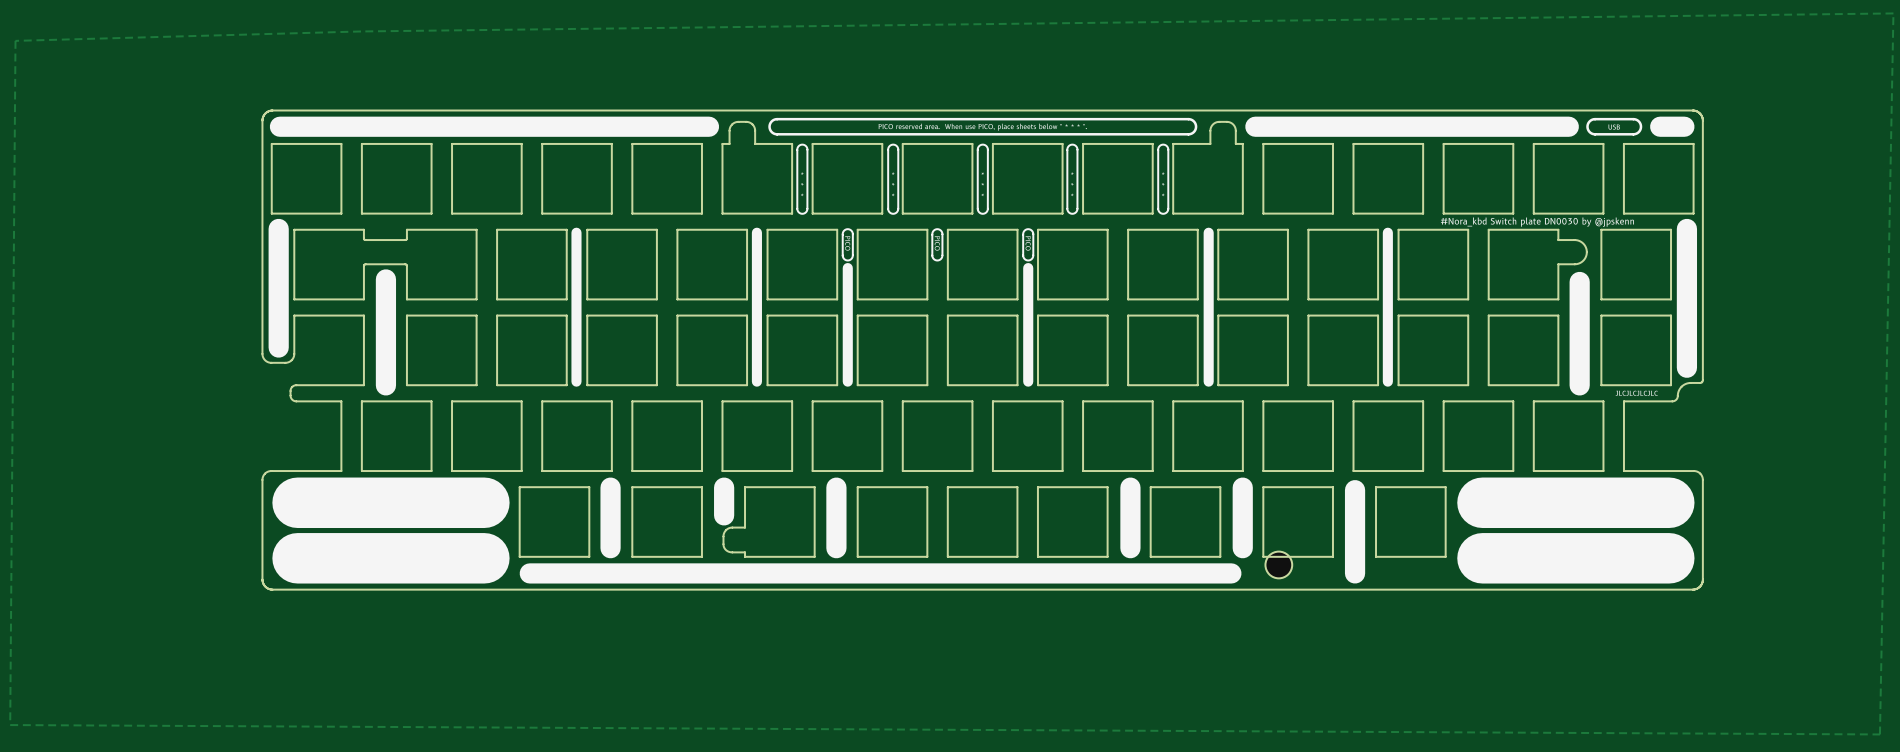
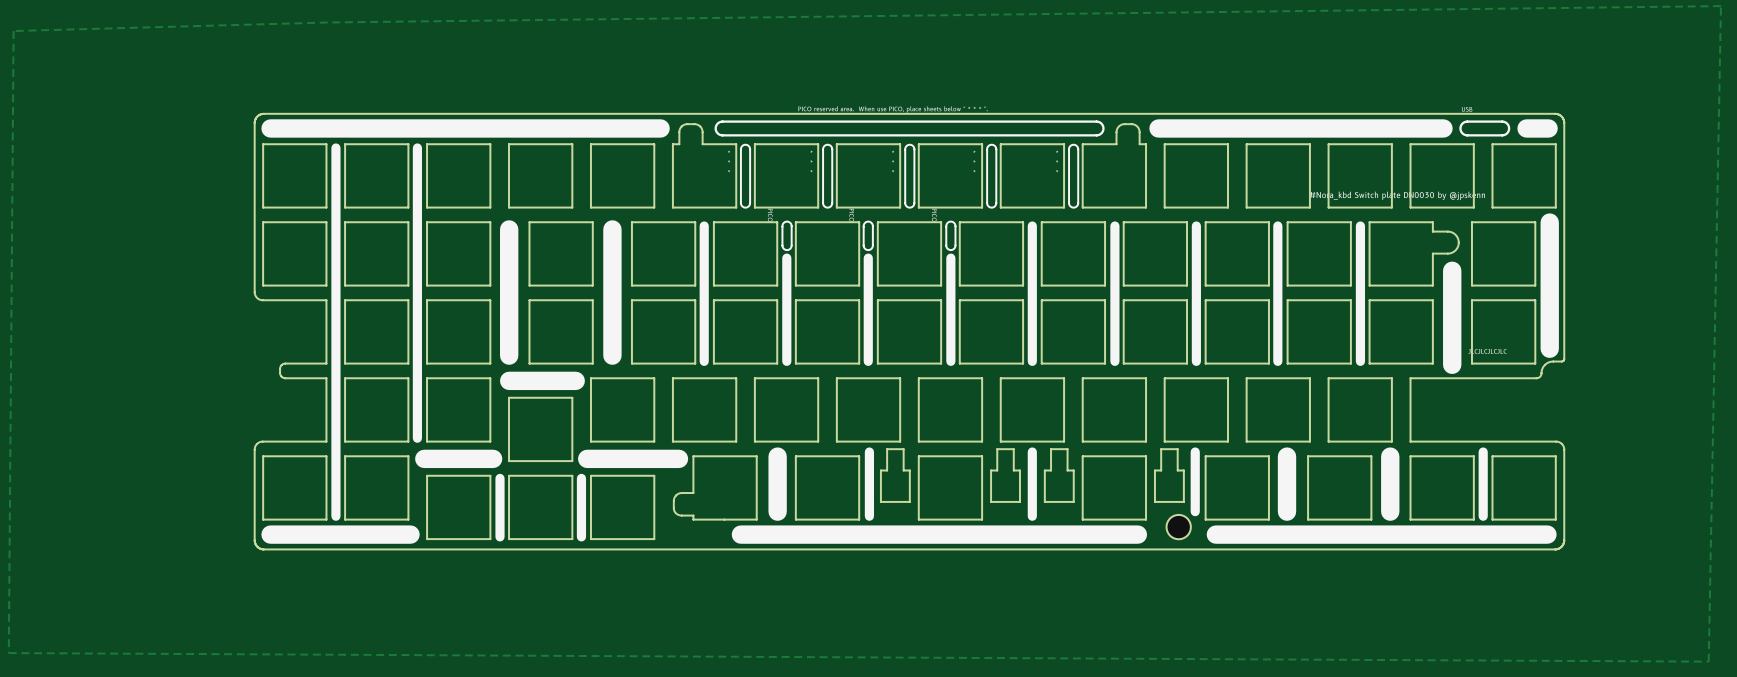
drawing: [261, 109, 1704, 591] -> none
line: (1188, 119) (777, 119) (771, 121) (769, 126) (771, 132) (777, 134) (1188, 134) (1193, 132) (1196, 126) (1193, 121) (1188, 119) -> (1096, 121) (722, 121) (717, 123) (715, 128) (717, 133) (722, 135) (1096, 135) (1101, 133) (1103, 128) (1101, 123) (1096, 121)
line: (1633, 119) (1594, 119) (1589, 122) (1587, 127) (1589, 132) (1594, 134) (1634, 134) (1638, 132) (1640, 126) (1638, 121) (1633, 119) -> (1502, 121) (1466, 121) (1461, 124) (1460, 129) (1466, 135) (1503, 135) (1507, 133) (1509, 128) (1507, 123) (1502, 121)
line: (708, 126) (279, 126) -> (660, 128) (270, 128)
line: (1568, 126) (1255, 126) -> (1443, 128) (1158, 128)
line: (1684, 126) (1660, 126) -> (1548, 128) (1526, 128)
board edge: none -> (694, 124) (682, 126) (679, 131) (679, 144) (672, 144) (672, 207) (736, 207) (736, 144) (702, 144) (702, 129) (694, 124)
board edge: none -> (1131, 124) (1122, 124) (1118, 127) (1116, 144) (1082, 144) (1082, 207) (1146, 207) (1146, 144) (1139, 144) (1138, 129) (1131, 124)
line: (807, 149) (807, 209) (801, 213) (797, 209) (797, 148) (802, 144) (807, 149) -> (750, 149) (750, 203) (744, 207) (740, 203) (740, 148) (745, 144) (750, 149)
line: (898, 149) (898, 209) (892, 213) (888, 209) (888, 148) (893, 144) (898, 149) -> (832, 149) (832, 203) (827, 207) (823, 203) (823, 148) (828, 144) (832, 149)
line: (987, 149) (987, 209) (982, 213) (977, 209) (977, 148) (983, 144) (987, 149) -> (914, 149) (914, 203) (909, 207) (905, 203) (905, 148) (910, 144) (914, 149)
line: (1077, 149) (1077, 209) (1071, 213) (1067, 209) (1067, 148) (1072, 144) (1077, 149) -> (996, 149) (996, 203) (991, 207) (987, 203) (987, 148) (992, 144) (996, 149)
line: (1168, 149) (1168, 209) (1162, 213) (1158, 209) (1158, 148) (1163, 144) (1168, 149) -> (1078, 149) (1078, 203) (1073, 207) (1069, 203) (1069, 148) (1073, 144) (1078, 149)
board edge: none -> (326, 144) (326, 207) (263, 207) (263, 144) (326, 144)
board edge: none -> (408, 144) (408, 207) (345, 207) (345, 144) (408, 144)
board edge: none -> (490, 144) (490, 207) (427, 207) (427, 144) (490, 144)
board edge: none -> (572, 144) (572, 207) (509, 207) (509, 144) (572, 144)
board edge: none -> (654, 144) (654, 207) (590, 207) (590, 144) (654, 144)
board edge: none -> (818, 144) (818, 207) (754, 207) (754, 144) (818, 144)
board edge: none -> (900, 144) (900, 207) (836, 207) (836, 144) (900, 144)
board edge: none -> (982, 144) (982, 207) (918, 207) (918, 144) (982, 144)
board edge: none -> (1064, 144) (1064, 207) (1000, 207) (1000, 144) (1064, 144)
board edge: none -> (1227, 144) (1227, 207) (1164, 207) (1164, 144) (1227, 144)
board edge: none -> (1309, 144) (1309, 207) (1246, 207) (1246, 144) (1309, 144)
board edge: none -> (1391, 144) (1391, 207) (1328, 207) (1328, 144) (1391, 144)
board edge: none -> (1473, 144) (1473, 207) (1410, 207) (1410, 144) (1473, 144)
board edge: none -> (1555, 144) (1555, 207) (1492, 207) (1492, 144) (1555, 144)
line: none -> (335, 147) (335, 516)
line: none -> (417, 147) (417, 438)
line: (278, 228) (278, 347) -> none
line: (1686, 228) (1686, 367) -> (1549, 222) (1549, 348)
line: (576, 232) (576, 381) -> none
line: (756, 232) (756, 381) -> (704, 225) (704, 361)
line: (1208, 232) (1208, 381) -> (1114, 225) (1114, 361)
line: (1387, 232) (1387, 381) -> (1277, 225) (1277, 361)
board edge: none -> (326, 222) (263, 222) (263, 285) (326, 285) (326, 222)
board edge: none -> (408, 222) (345, 222) (345, 285) (408, 285) (408, 222)
board edge: none -> (490, 222) (427, 222) (427, 285) (490, 285) (490, 222)
board edge: none -> (592, 222) (529, 222) (529, 285) (592, 285) (592, 222)
board edge: none -> (695, 222) (631, 222) (631, 285) (695, 285) (695, 222)
board edge: none -> (777, 222) (713, 222) (713, 285) (777, 285) (777, 222)
board edge: none -> (859, 222) (859, 285) (795, 285) (795, 222) (859, 222)
board edge: none -> (941, 222) (877, 222) (877, 285) (941, 285) (941, 222)
board edge: none -> (1023, 222) (959, 222) (959, 285) (1023, 285) (1023, 222)
board edge: none -> (1105, 222) (1041, 222) (1041, 285) (1105, 285) (1105, 222)
board edge: none -> (1187, 222) (1123, 222) (1123, 285) (1187, 285) (1187, 222)
board edge: none -> (1268, 222) (1205, 222) (1205, 285) (1268, 285) (1268, 222)
board edge: none -> (1350, 222) (1350, 285) (1287, 285) (1287, 222) (1350, 222)
board edge: none -> (1432, 222) (1369, 222) (1369, 285) (1432, 285) (1432, 253) (1452, 252) (1456, 248) (1458, 242) (1456, 236) (1452, 232) (1432, 231) (1432, 222)
board edge: none -> (1535, 222) (1471, 222) (1471, 285) (1535, 285) (1535, 222)
line: (852, 255) (847, 260) (842, 255) -> (791, 245) (787, 250) (782, 245)
line: (852, 255) (852, 232) (847, 229) (842, 233) (842, 255) -> (791, 245) (791, 225) (786, 221) (782, 225) (782, 245)
line: (942, 255) (937, 260) (932, 255) -> (872, 245) (868, 250) (863, 245)
line: (942, 255) (942, 232) (937, 229) (932, 233) (932, 255) -> (872, 245) (872, 225) (868, 221) (863, 225) (863, 245)
line: (1033, 255) (1028, 260) (1023, 255) -> (955, 245) (950, 250) (946, 245)
line: (1033, 255) (1033, 232) (1027, 229) (1023, 233) (1023, 255) -> (955, 245) (955, 225) (950, 221) (946, 225) (946, 245)
line: none -> (1032, 225) (1032, 361)
line: none -> (1196, 225) (1196, 361)
line: none -> (1360, 225) (1360, 361)
line: none -> (509, 229) (509, 355)
line: none -> (612, 229) (612, 355)
line: (847, 268) (847, 381) -> (786, 258) (786, 361)
line: (1028, 268) (1028, 381) -> (950, 258) (950, 361)
line: (385, 279) (385, 385) -> none
line: (1579, 281) (1579, 385) -> (1452, 270) (1452, 364)
line: none -> (868, 258) (868, 361)
board edge: none -> (408, 300) (345, 300) (345, 363) (408, 363) (408, 300)
board edge: none -> (490, 300) (427, 300) (427, 363) (490, 363) (490, 300)
board edge: none -> (592, 300) (529, 300) (529, 363) (592, 363) (592, 300)
board edge: none -> (695, 300) (631, 300) (631, 363) (695, 363) (695, 300)
board edge: none -> (777, 300) (713, 300) (713, 363) (777, 363) (777, 300)
board edge: none -> (859, 300) (795, 300) (795, 363) (859, 363) (859, 300)
board edge: none -> (941, 300) (877, 300) (877, 363) (941, 363) (941, 300)
board edge: none -> (1023, 300) (959, 300) (959, 363) (1023, 363) (1023, 300)
board edge: none -> (1105, 300) (1041, 300) (1041, 363) (1105, 363) (1105, 300)
board edge: none -> (1187, 300) (1123, 300) (1123, 363) (1187, 363) (1187, 300)
board edge: none -> (1268, 300) (1205, 300) (1205, 363) (1268, 363) (1268, 300)
board edge: none -> (1350, 300) (1287, 300) (1287, 363) (1350, 363) (1350, 300)
board edge: none -> (1432, 300) (1369, 300) (1369, 363) (1432, 363) (1432, 300)
board edge: none -> (1535, 300) (1471, 300) (1471, 363) (1535, 363) (1535, 300)
board edge: none -> (1541, 373) (1536, 378) (1410, 378) (1410, 441) (1556, 441) (1560, 443) (1564, 449) (1564, 540) (1562, 546) (1556, 549) (261, 549) (256, 546) (254, 540) (255, 445) (262, 441) (326, 441) (326, 378) (284, 378) (280, 372) (280, 366) (284, 363) (326, 363) (326, 300) (261, 300) (255, 295) (254, 121) (257, 116) (263, 113) (1556, 113) (1562, 117) (1564, 123) (1564, 359) (1561, 361) (1547, 363) (1543, 367) (1541, 373)
board edge: none -> (408, 378) (345, 378) (345, 441) (408, 441) (408, 378)
board edge: none -> (490, 378) (427, 378) (427, 441) (490, 441) (490, 378)
board edge: none -> (654, 378) (590, 378) (590, 441) (654, 441) (654, 378)
board edge: none -> (736, 378) (672, 378) (672, 441) (736, 441) (736, 378)
board edge: none -> (818, 378) (754, 378) (754, 441) (818, 441) (818, 378)
board edge: none -> (900, 378) (836, 378) (836, 441) (900, 441) (900, 378)
board edge: none -> (982, 378) (918, 378) (918, 441) (982, 441) (982, 378)
board edge: none -> (1064, 378) (1000, 378) (1000, 441) (1064, 441) (1064, 378)
board edge: none -> (1146, 378) (1082, 378) (1082, 441) (1146, 441) (1146, 378)
board edge: none -> (1228, 378) (1164, 378) (1164, 441) (1228, 441) (1228, 378)
board edge: none -> (1309, 378) (1246, 378) (1246, 441) (1309, 441) (1309, 378)
board edge: none -> (1391, 378) (1328, 378) (1328, 441) (1391, 441) (1391, 378)
line: none -> (575, 380) (509, 380)
board edge: none -> (572, 397) (509, 397) (509, 461) (572, 461) (572, 397)
line: (610, 487) (610, 548) -> none
line: (724, 487) (724, 515) -> none
line: (836, 487) (836, 548) -> (777, 456) (777, 511)
line: (1130, 487) (1130, 548) -> none
line: (1242, 487) (1242, 548) -> none
line: (1355, 490) (1355, 573) -> none
board edge: none -> (903, 449) (887, 449) (887, 470) (880, 470) (880, 501) (909, 501) (909, 470) (903, 470) (903, 449)
board edge: none -> (1013, 449) (997, 449) (997, 470) (991, 470) (991, 501) (1019, 501) (1019, 470) (1013, 470) (1013, 449)
board edge: none -> (1067, 449) (1051, 449) (1051, 470) (1044, 470) (1044, 501) (1073, 501) (1073, 470) (1067, 470) (1067, 449)
board edge: none -> (1177, 449) (1161, 449) (1161, 470) (1154, 470) (1154, 501) (1183, 501) (1183, 470) (1177, 470) (1177, 449)
line: (484, 502) (297, 502) -> none
line: (1669, 502) (1482, 502) -> none
line: none -> (869, 452) (869, 516)
line: none -> (1032, 452) (1032, 516)
line: none -> (1195, 452) (1195, 511)
line: none -> (1483, 452) (1483, 516)
board edge: none -> (326, 456) (263, 456) (263, 519) (326, 519) (326, 456)
board edge: none -> (408, 456) (345, 456) (345, 519) (408, 519) (408, 456)
board edge: none -> (756, 456) (693, 456) (693, 493) (680, 493) (675, 495) (673, 500) (675, 512) (680, 515) (693, 515) (693, 519) (756, 519) (756, 456)
board edge: none -> (859, 456) (795, 456) (795, 519) (859, 519) (859, 456)
board edge: none -> (982, 456) (918, 456) (918, 519) (982, 519) (982, 456)
board edge: none -> (1146, 456) (1082, 456) (1082, 519) (1146, 519) (1146, 456)
board edge: none -> (1268, 456) (1205, 456) (1205, 519) (1268, 519) (1268, 456)
line: none -> (1287, 456) (1287, 511)
board edge: none -> (1371, 456) (1308, 456) (1308, 519) (1371, 519) (1371, 456)
line: none -> (1390, 456) (1390, 511)
board edge: none -> (1473, 456) (1410, 456) (1410, 519) (1473, 519) (1473, 456)
board edge: none -> (1555, 456) (1492, 456) (1492, 519) (1555, 519) (1555, 456)
line: none -> (493, 458) (424, 458)
line: none -> (678, 458) (587, 458)
board edge: none -> (490, 475) (427, 475) (427, 539) (490, 539) (490, 475)
board edge: none -> (572, 475) (572, 539) (509, 539) (509, 475) (572, 475)
board edge: none -> (654, 475) (590, 475) (590, 539) (654, 539) (654, 475)
line: none -> (500, 478) (500, 536)
line: none -> (581, 478) (581, 536)
line: (484, 558) (297, 558) -> none
line: (1669, 558) (1482, 558) -> none
part position: (1278, 564) -> (1178, 527)
line: (1231, 573) (529, 573) -> none
line: none -> (410, 534) (270, 534)
line: none -> (1137, 534) (740, 534)
line: none -> (1547, 534) (1215, 534)

